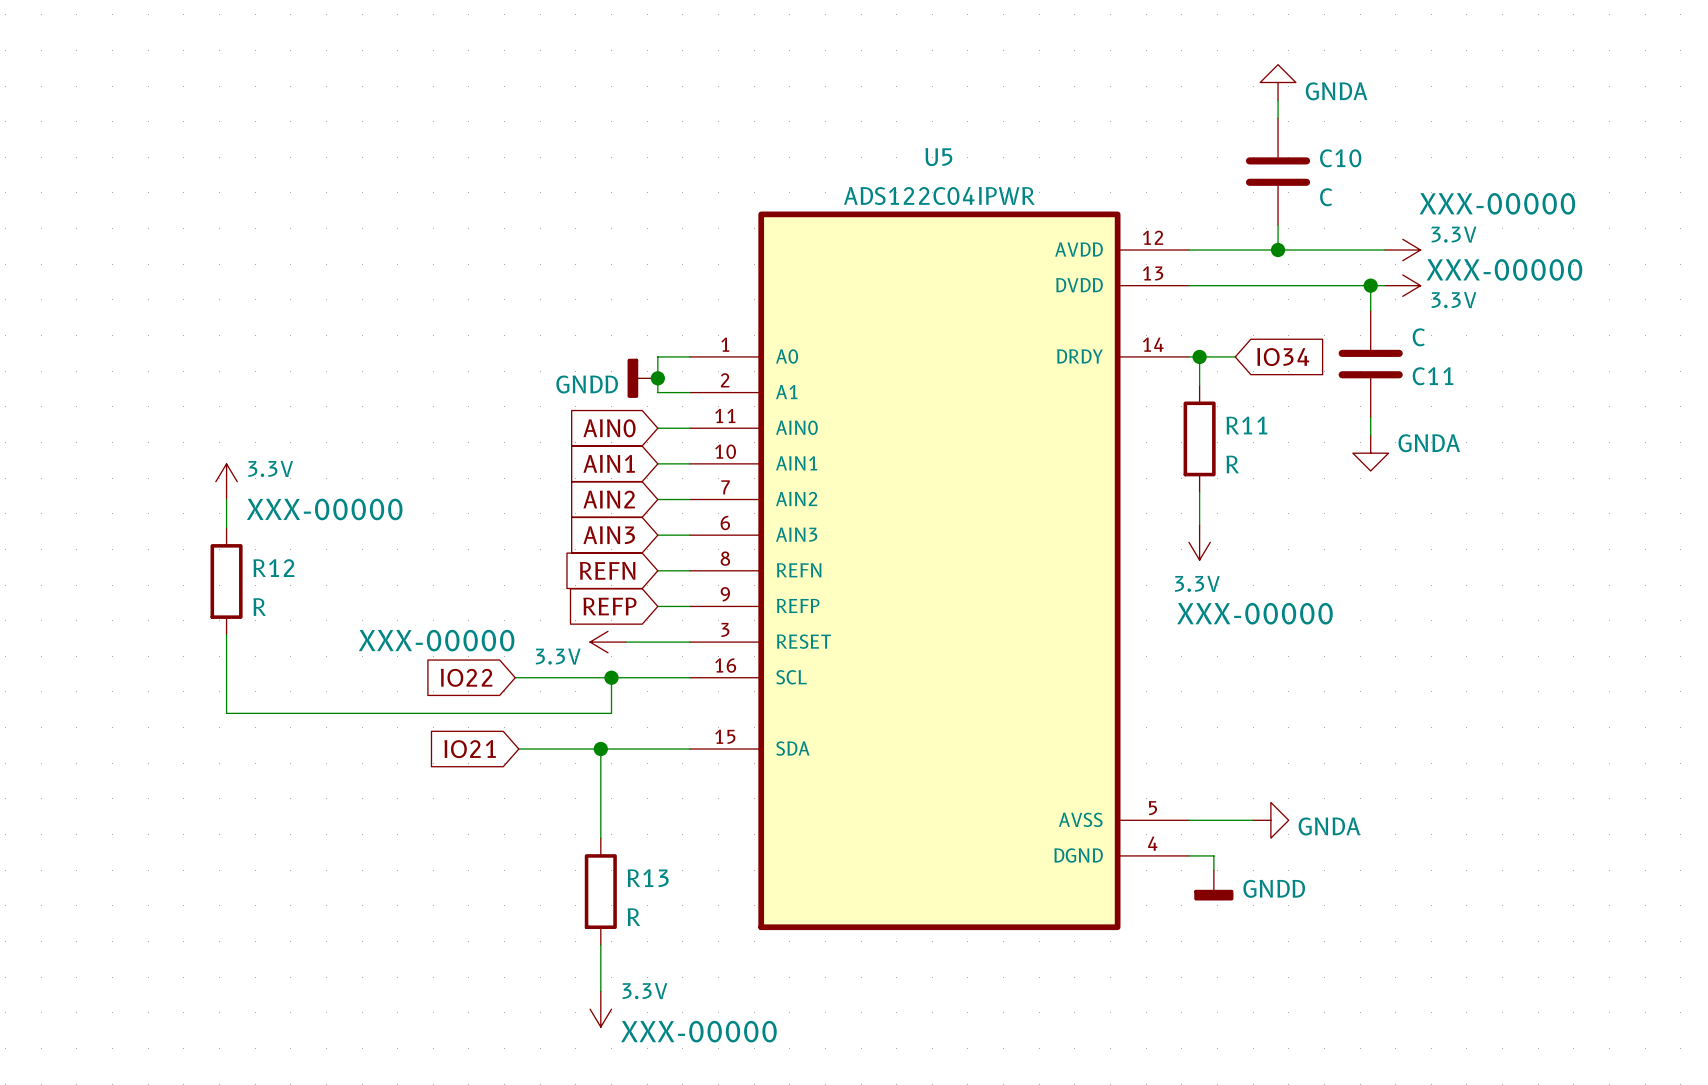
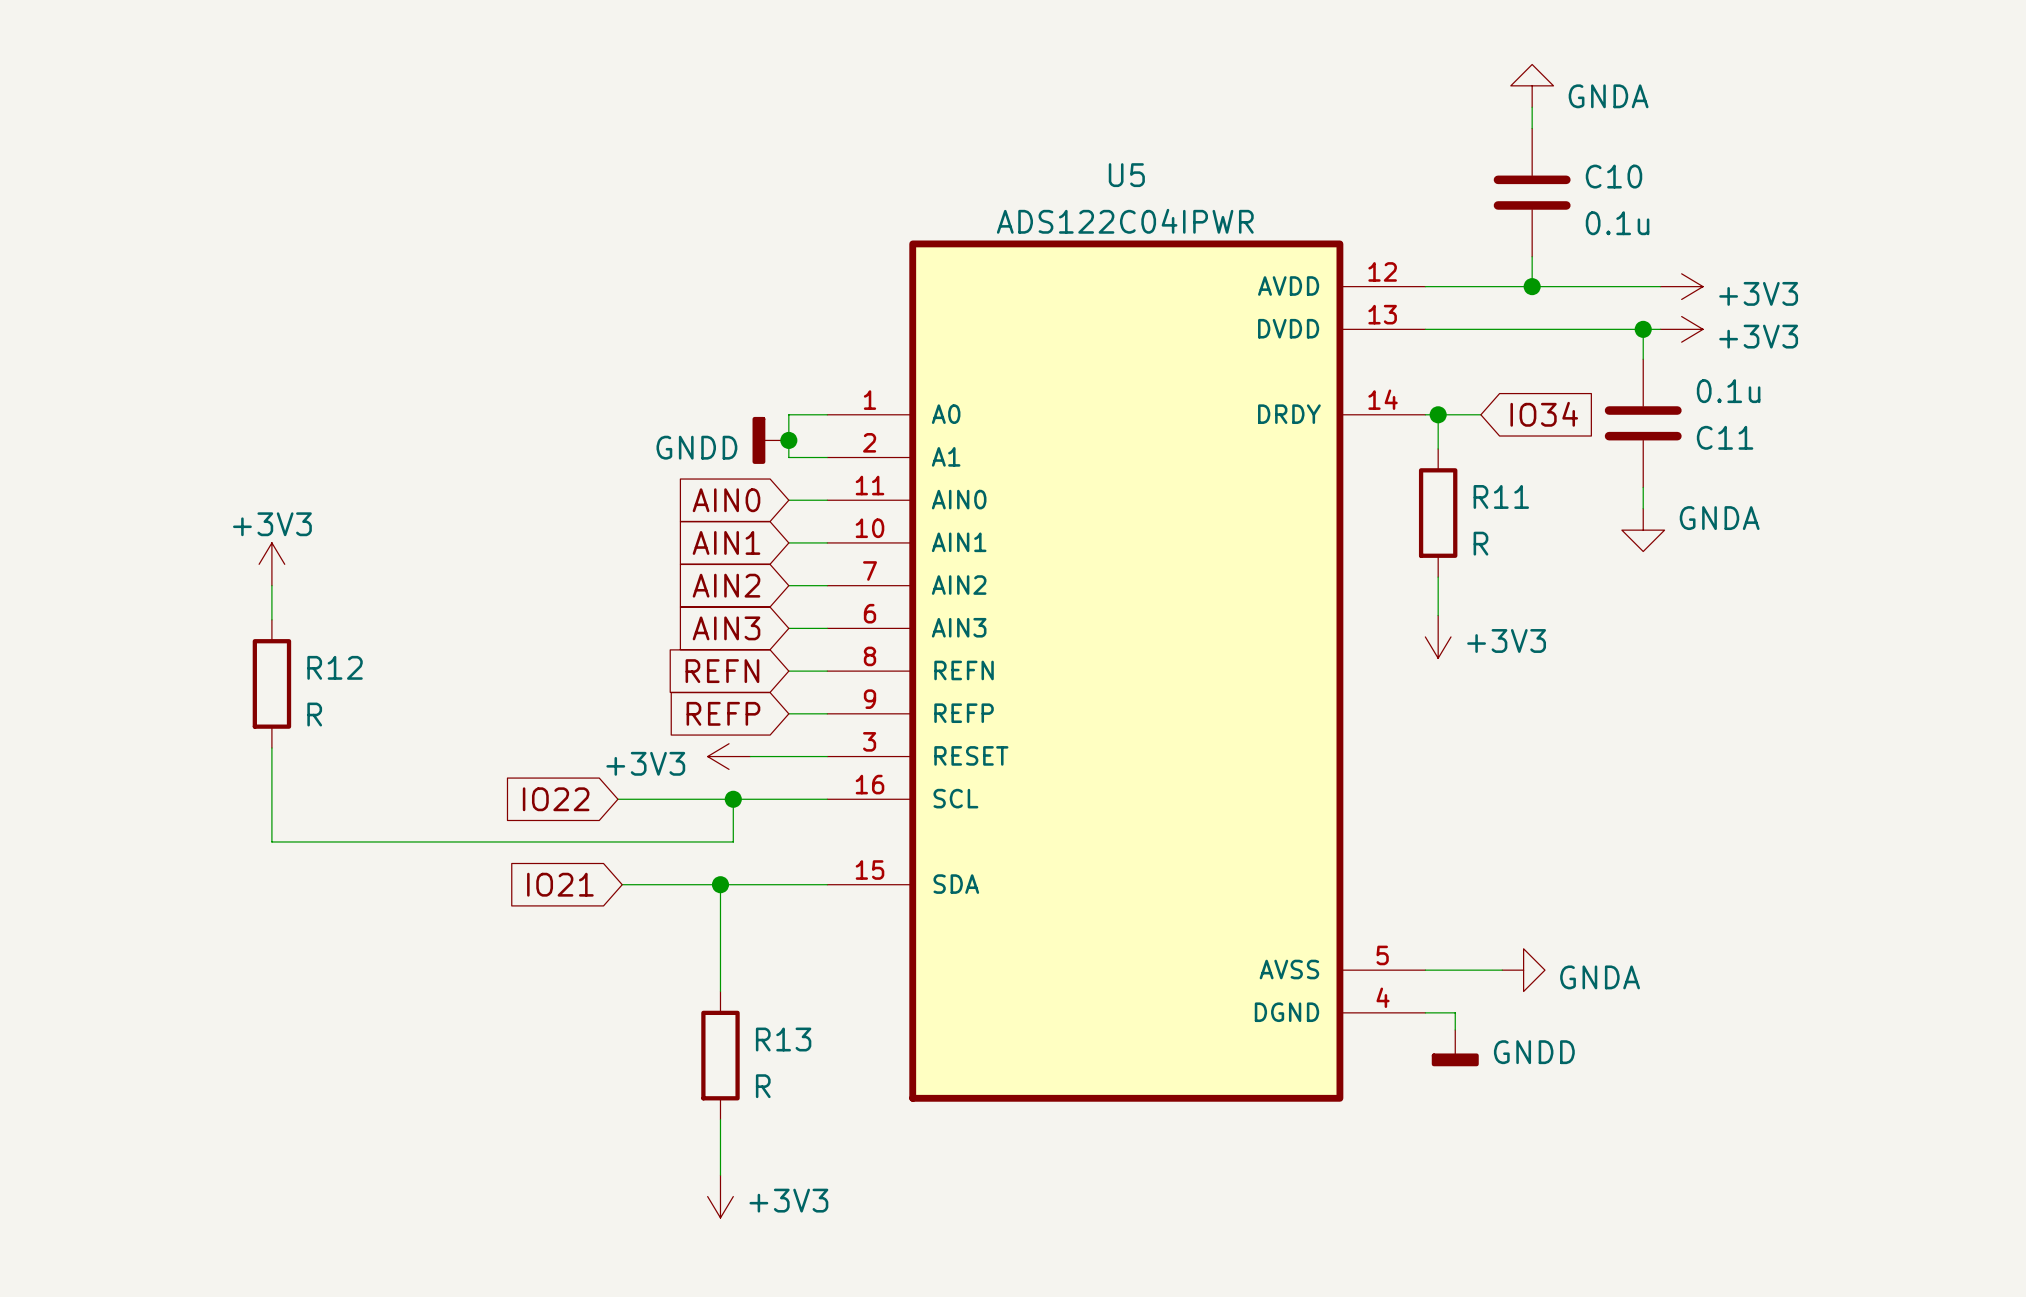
C10 value: C (1326, 197) -> 0.1u (1617, 223)
power symbol: 3.3V (1402, 250) -> +3V3 (1681, 286)
power symbol: 3.3V (1402, 285) -> +3V3 (1681, 329)
C11 value: C (1418, 337) -> 0.1u (1728, 391)
power symbol: 3.3V (226, 481) -> +3V3 (271, 564)
power symbol: 3.3V (1199, 542) -> +3V3 (1438, 636)
power symbol: 3.3V (607, 642) -> +3V3 (729, 756)
power symbol: 3.3V (600, 1009) -> +3V3 (720, 1196)

